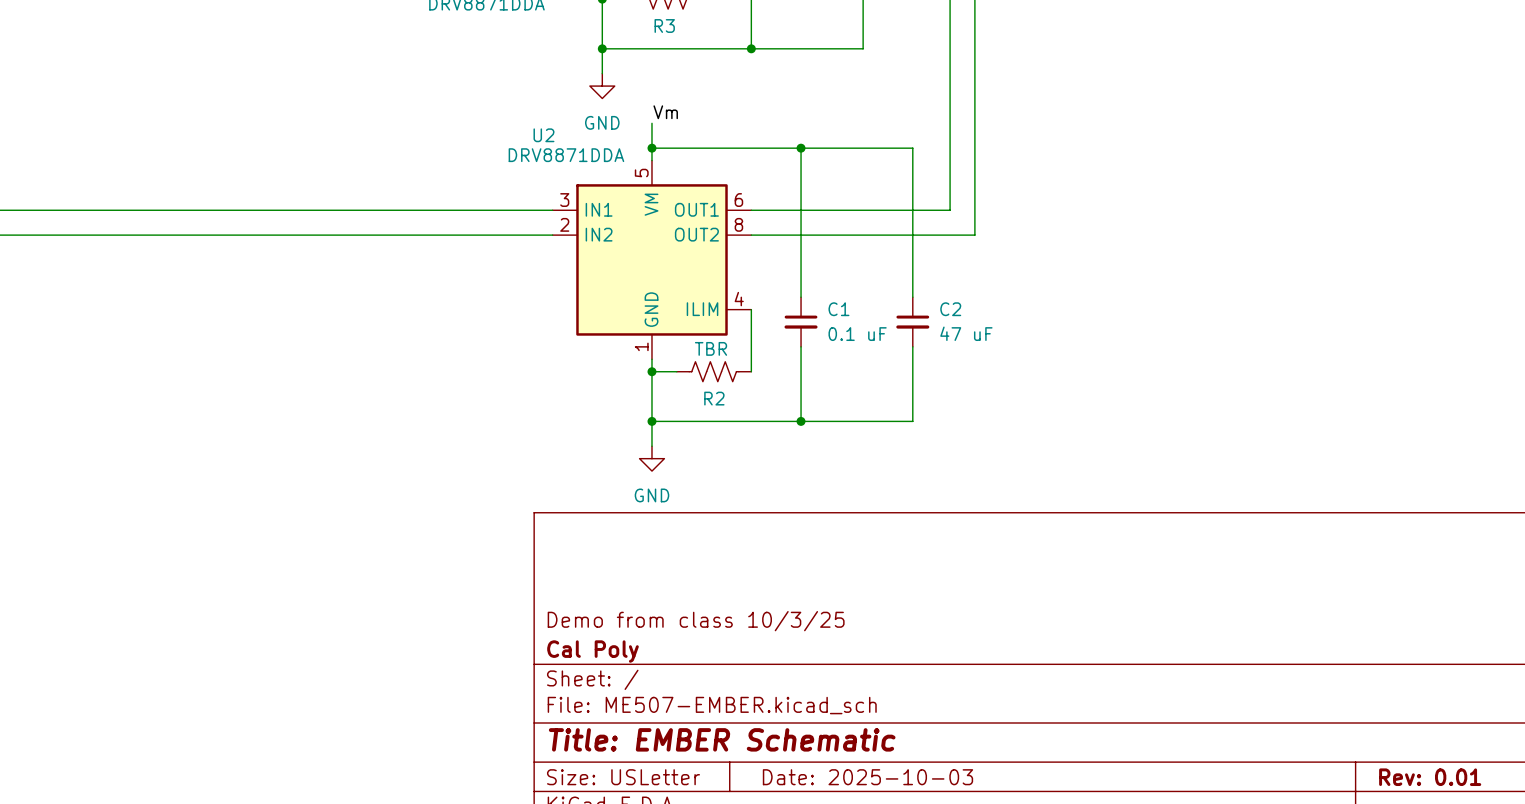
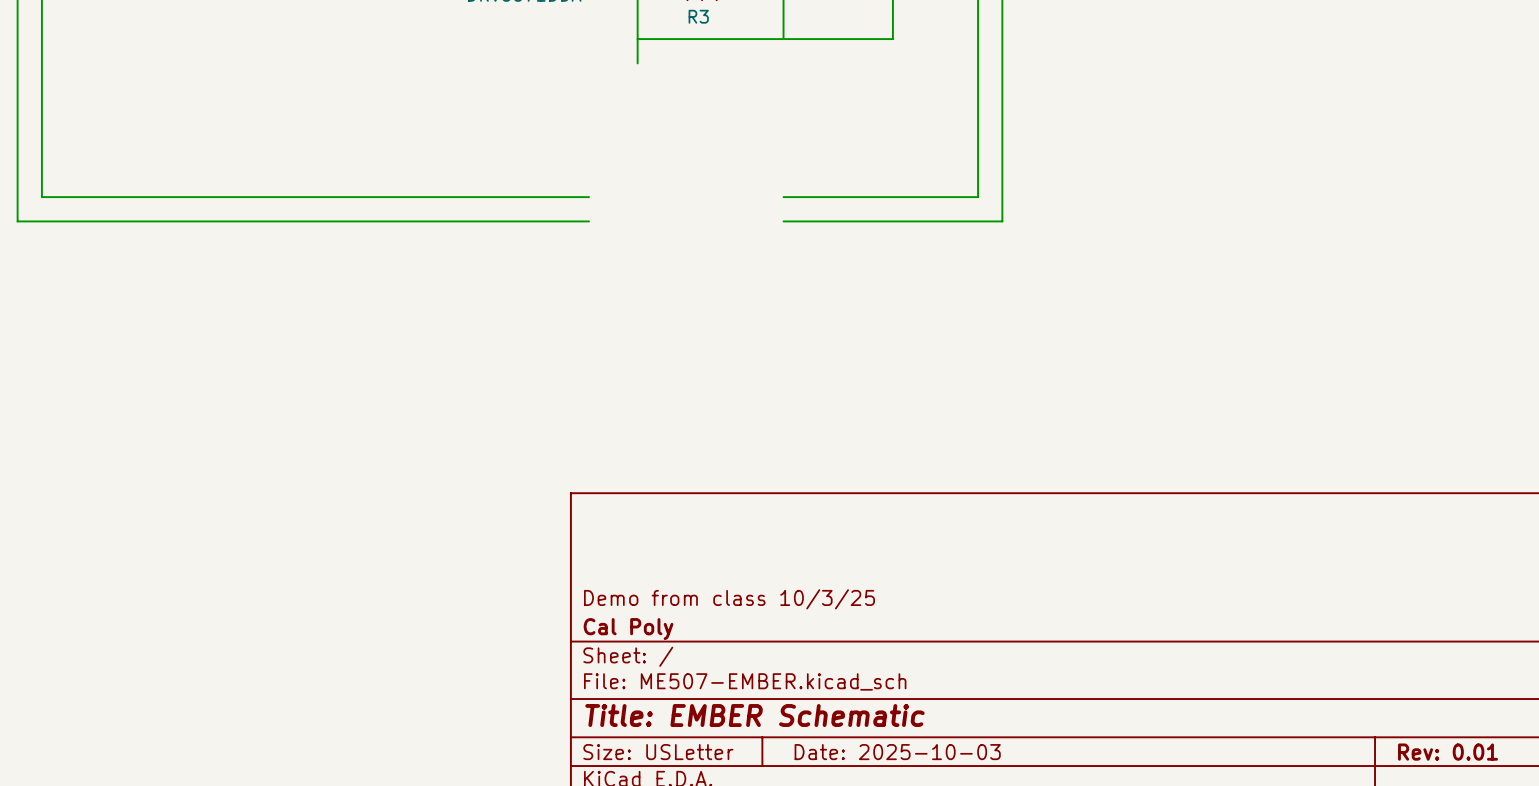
junction: (602, 48) -> none
junction: (751, 48) -> none
power symbol: GND (602, 86) -> none
label: Vm (665, 112) -> none
wire: (651, 123) (651, 160) -> none
wire: (651, 148) (912, 148) (912, 297) -> none
junction: (651, 148) -> none
wire: (801, 148) (801, 297) -> none
junction: (801, 148) -> none
U2: DRV8871DDA (651, 259) -> none
wire: (751, 309) (751, 371) -> none
C1: 0.1 uF (801, 322) -> none
C2: 47 uF (912, 322) -> none
wire: (801, 346) (801, 421) -> none
wire: (912, 346) (912, 421) (651, 421) -> none
wire: (651, 359) (651, 446) -> none
wire: (651, 371) (676, 371) -> none
junction: (651, 371) -> none
R2: TBR (714, 371) -> none
junction: (651, 421) -> none
junction: (801, 421) -> none
power symbol: GND (651, 458) -> none

